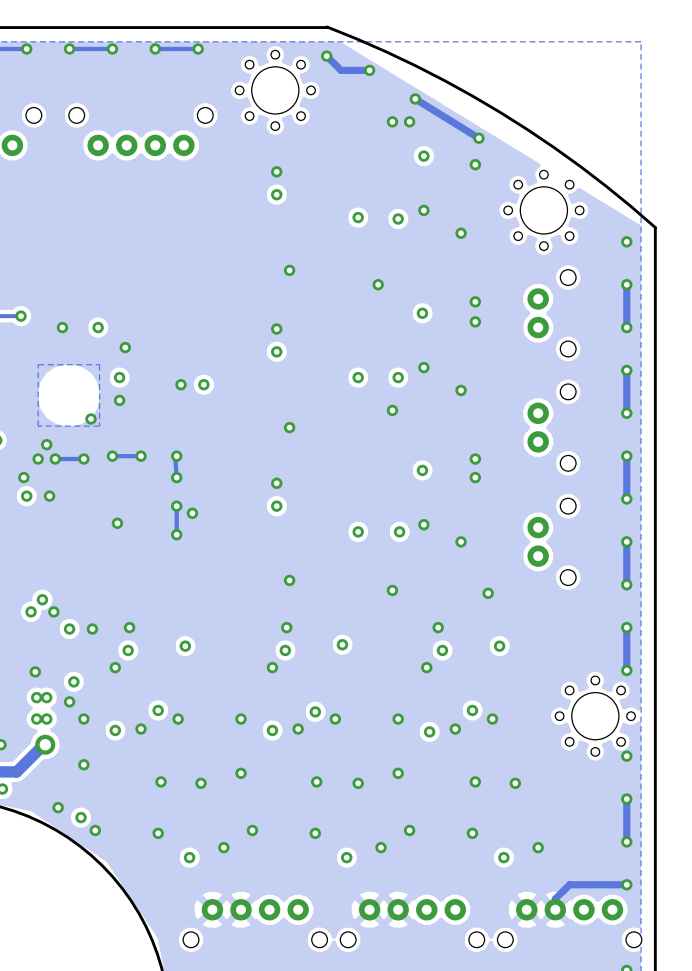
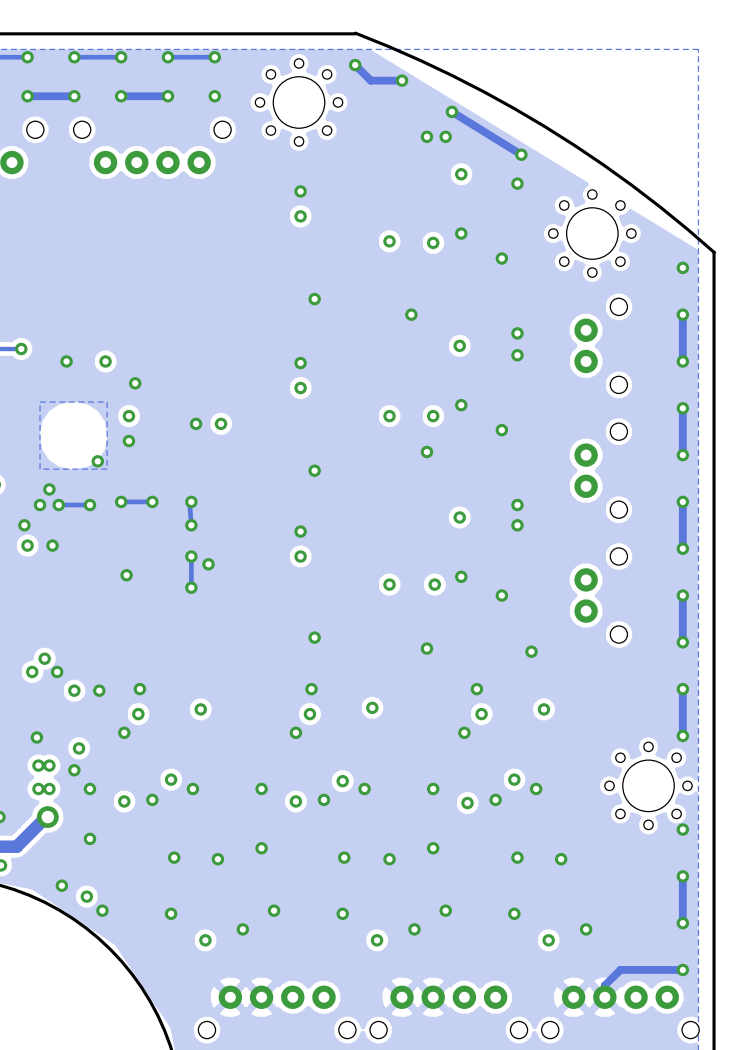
via: none -> (27, 96)
track: none -> (74, 96) (27, 96)
via: none -> (74, 96)
via: none -> (121, 96)
track: none -> (167, 96) (121, 96)
via: none -> (167, 96)
via: none -> (214, 96)

